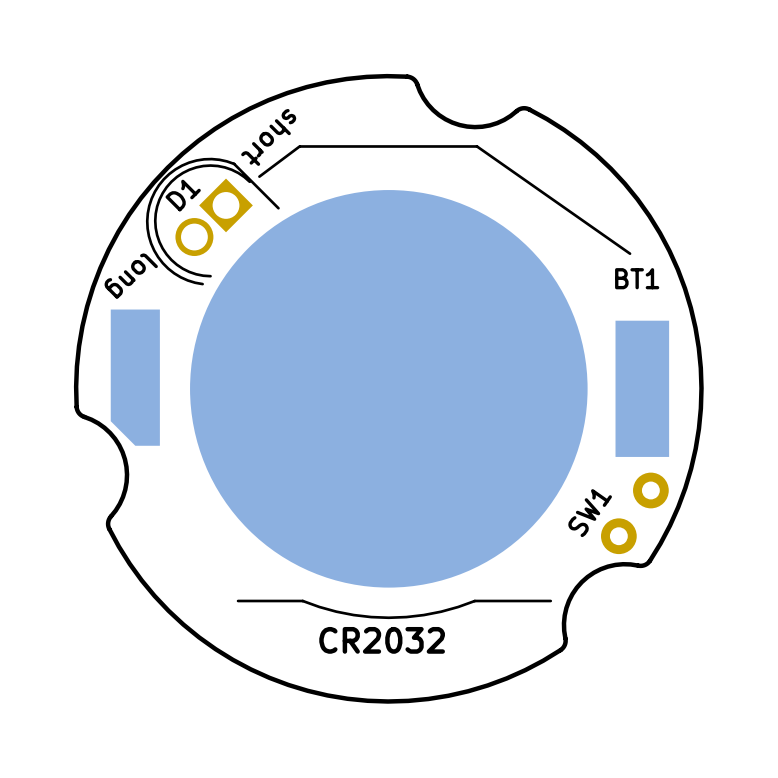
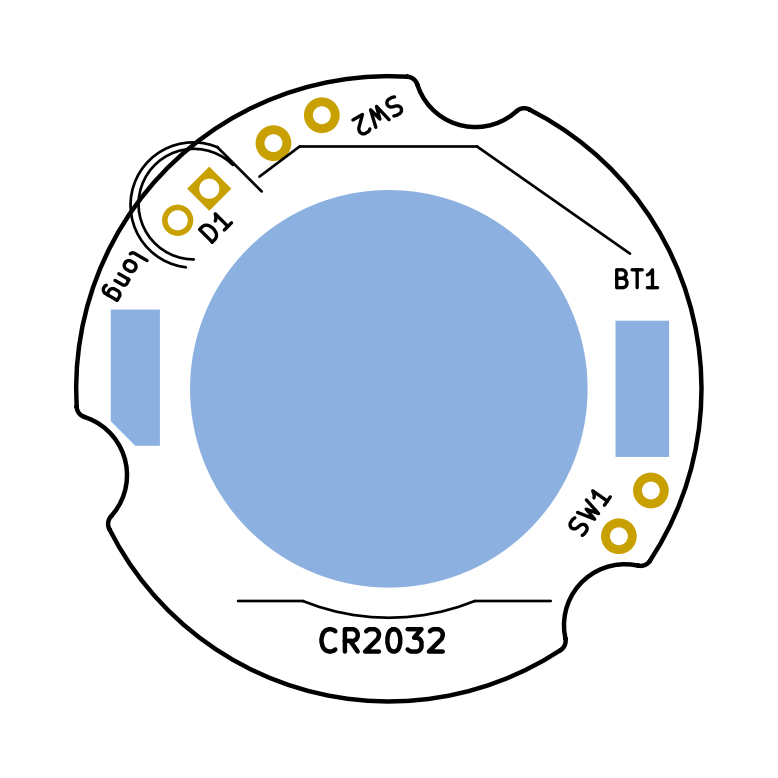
SW2: none -> (297, 129)
text: short (268, 137) -> none
D1 footprint: [145, 157, 280, 286] -> [129, 140, 264, 269]
D1 name position: D1 (183, 195) -> D1 (215, 227)
text rotation: 0° (131, 276) -> 15° counterclockwise (125, 276)

